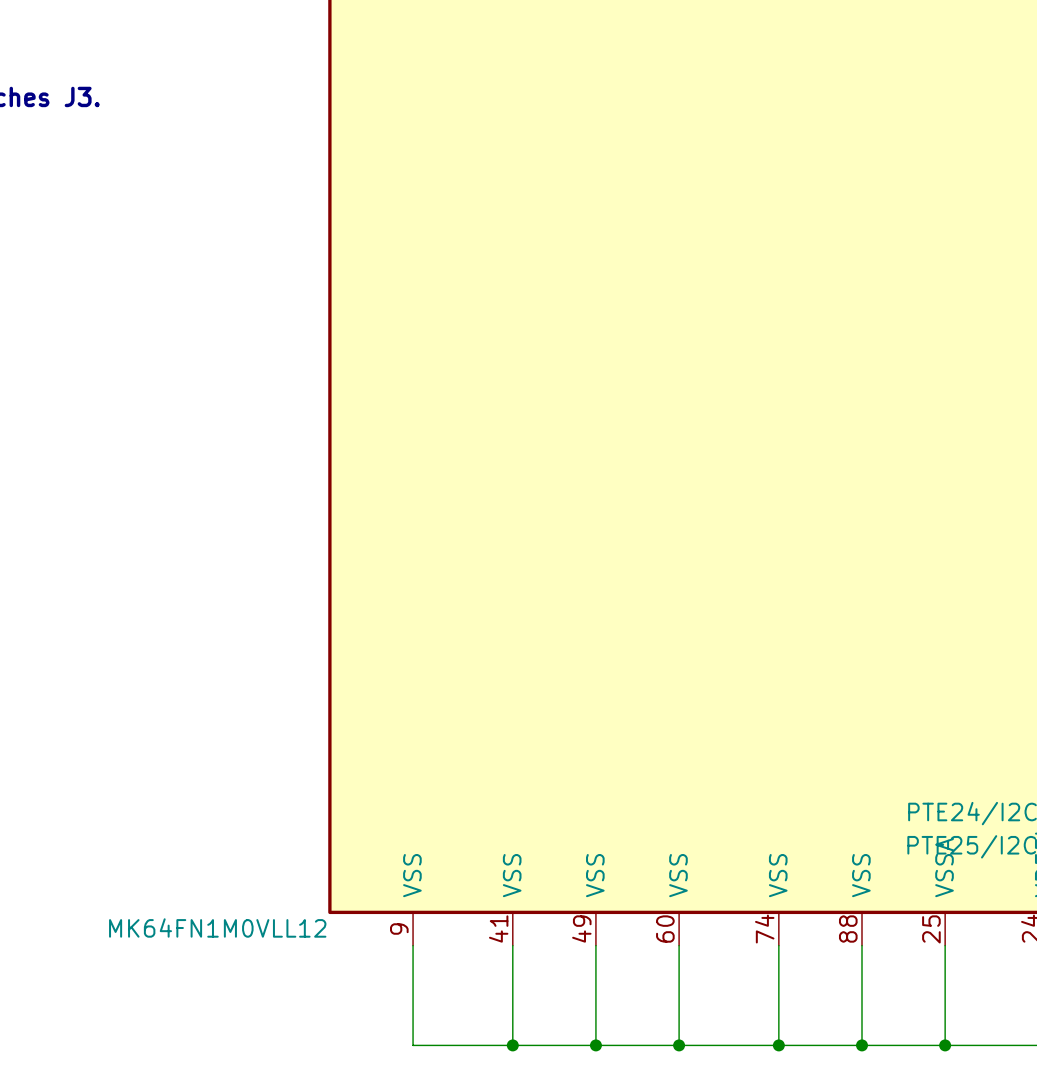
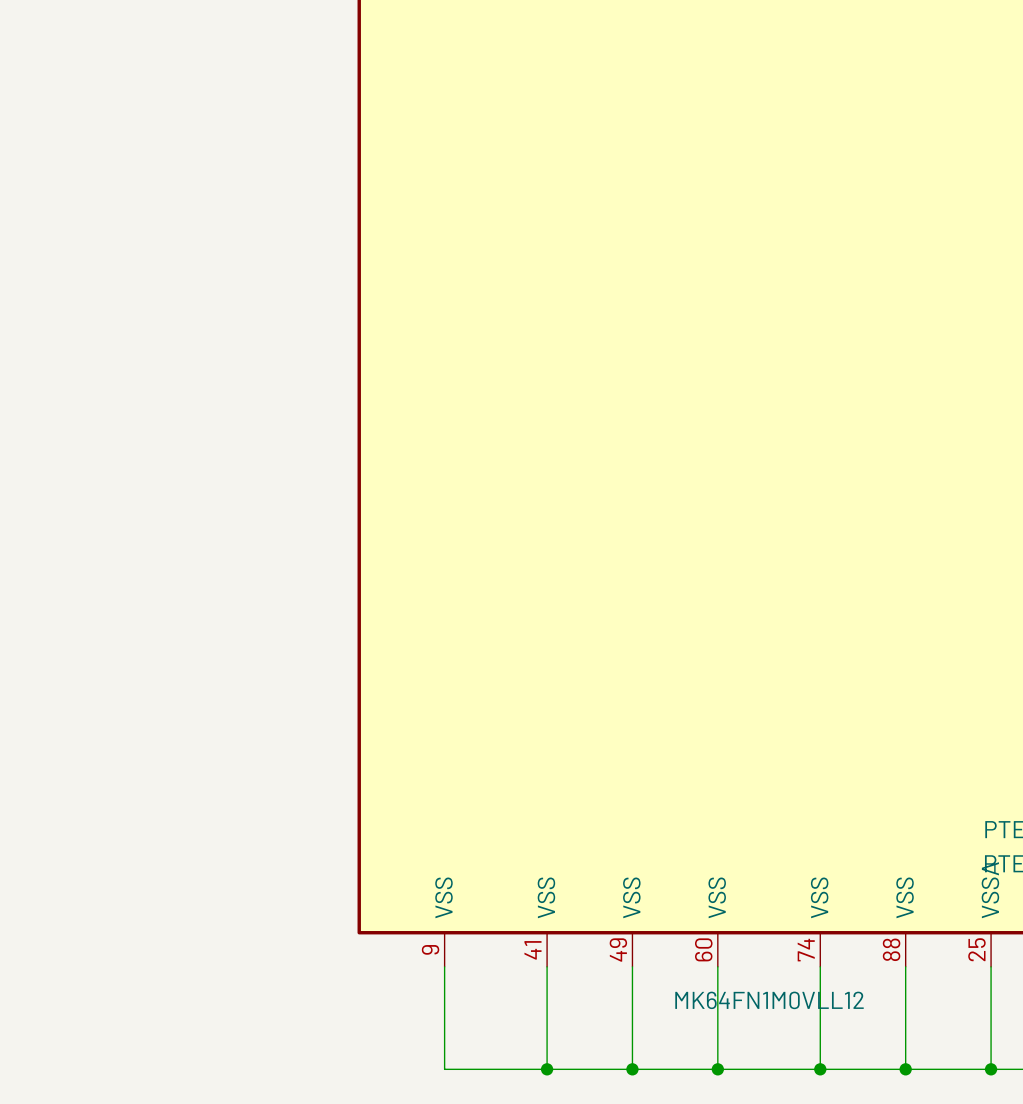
part value position: MK64FN1M0VLL12 (217, 927) -> MK64FN1M0VLL12 (769, 1000)

